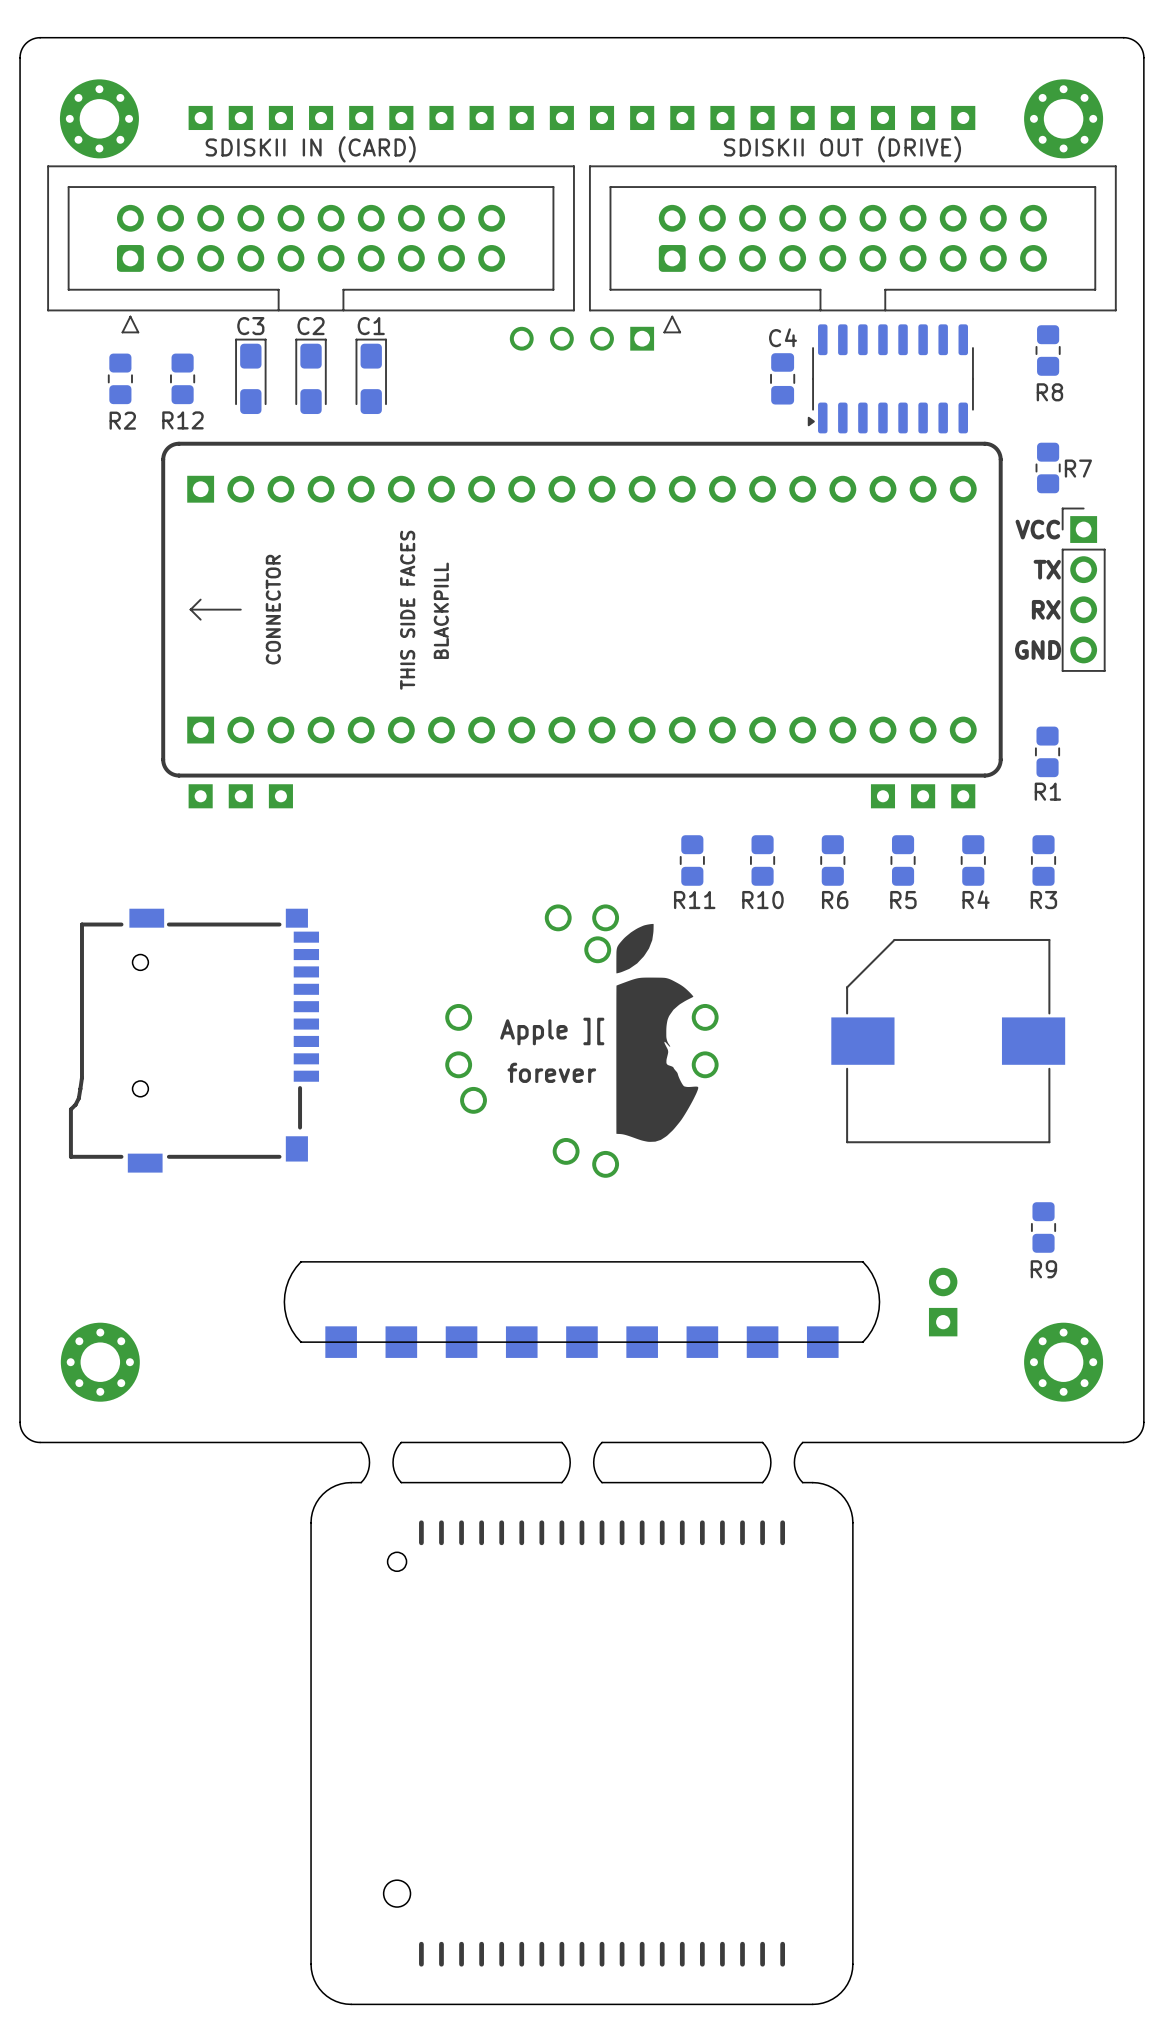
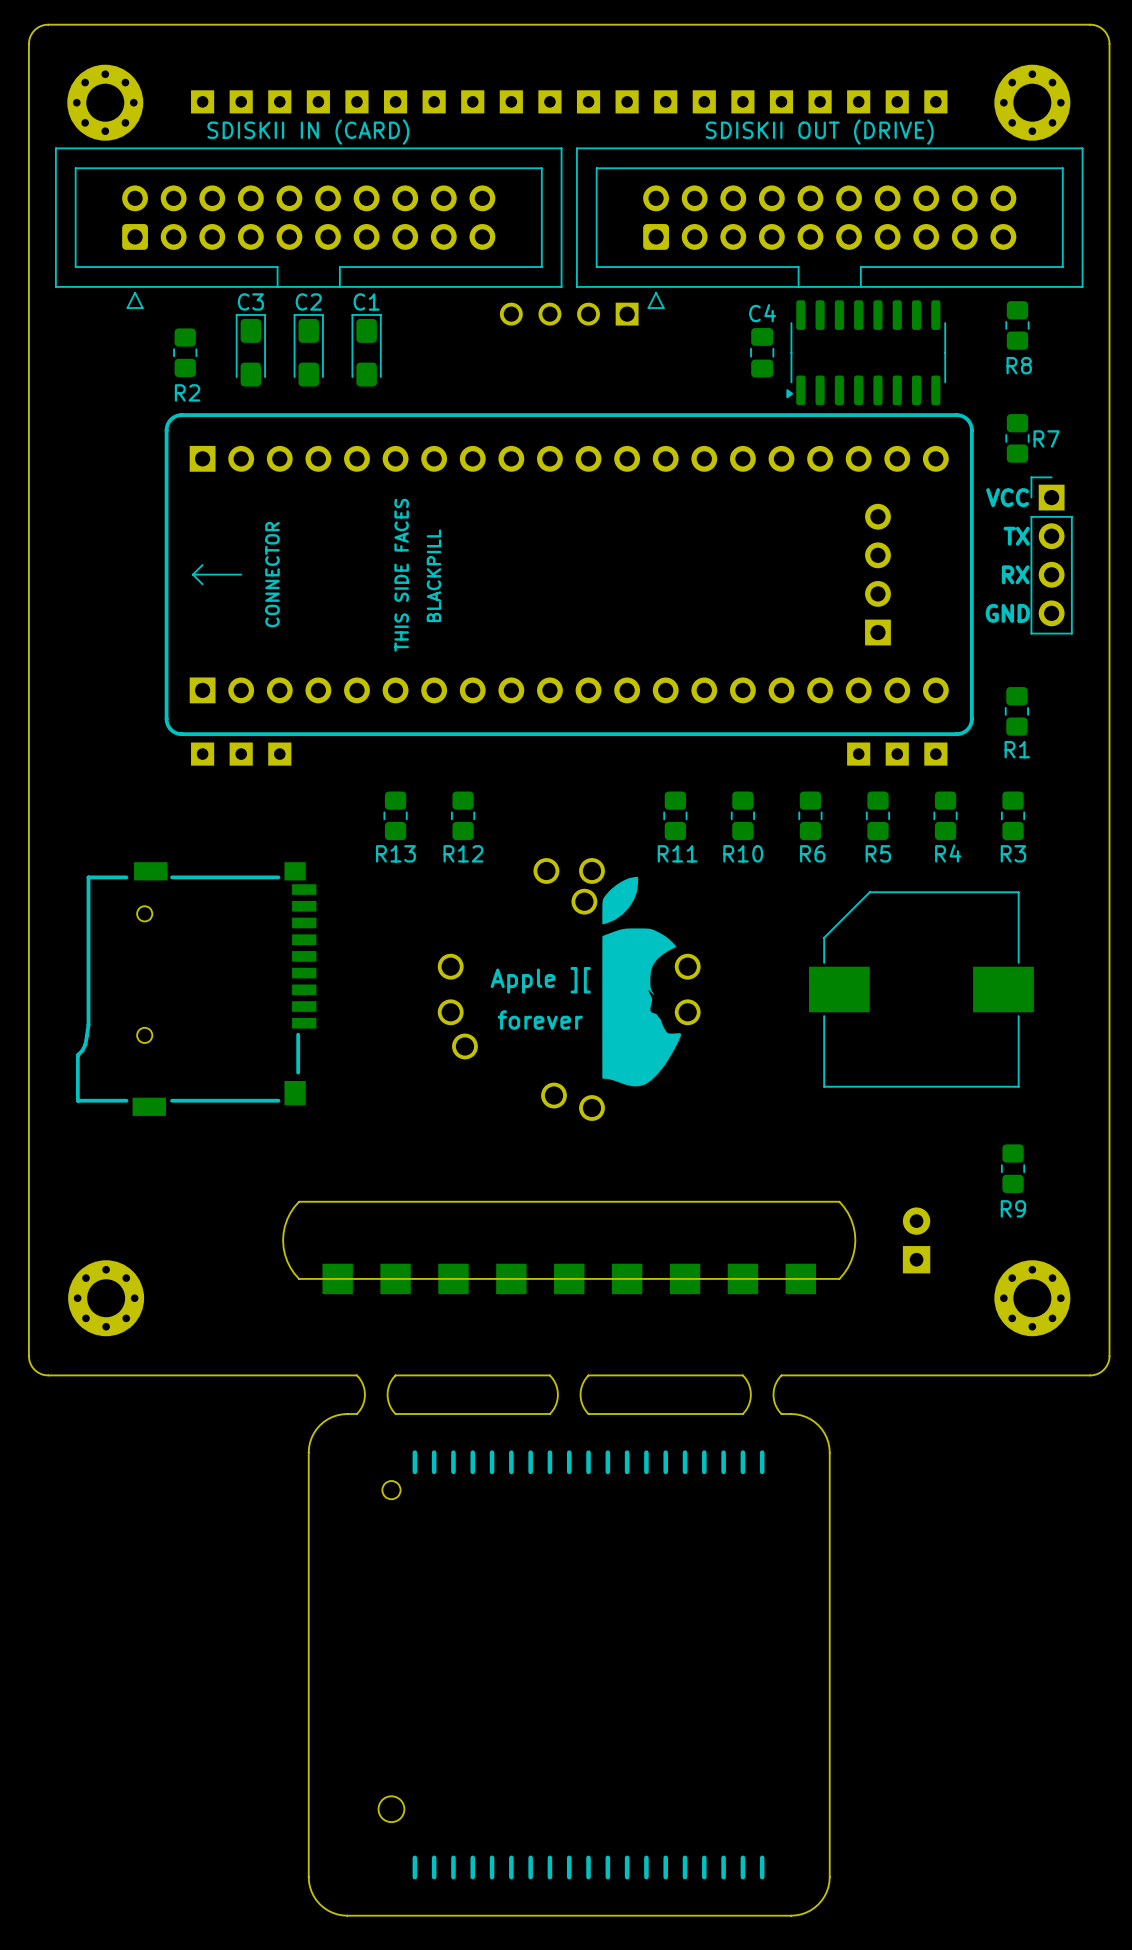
R2: (120, 378) -> none
R12 name: R12 (182, 420) -> R2 (187, 392)
part footprint: [161, 441, 1003, 778] -> [164, 413, 974, 737]
R13: none -> (395, 815)
R12: none -> (463, 815)

